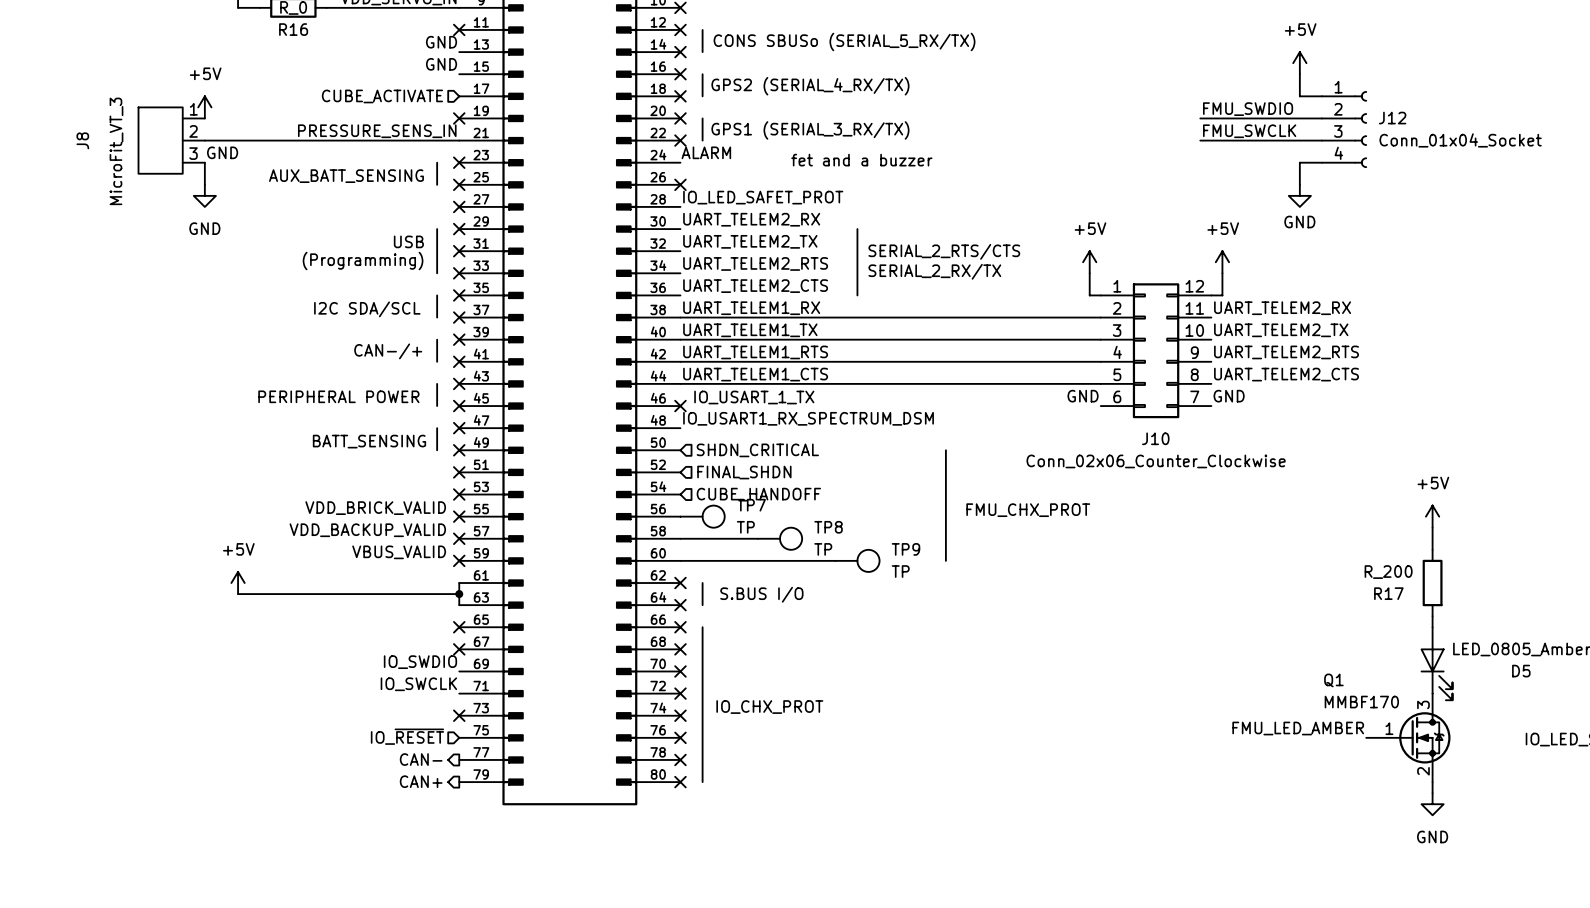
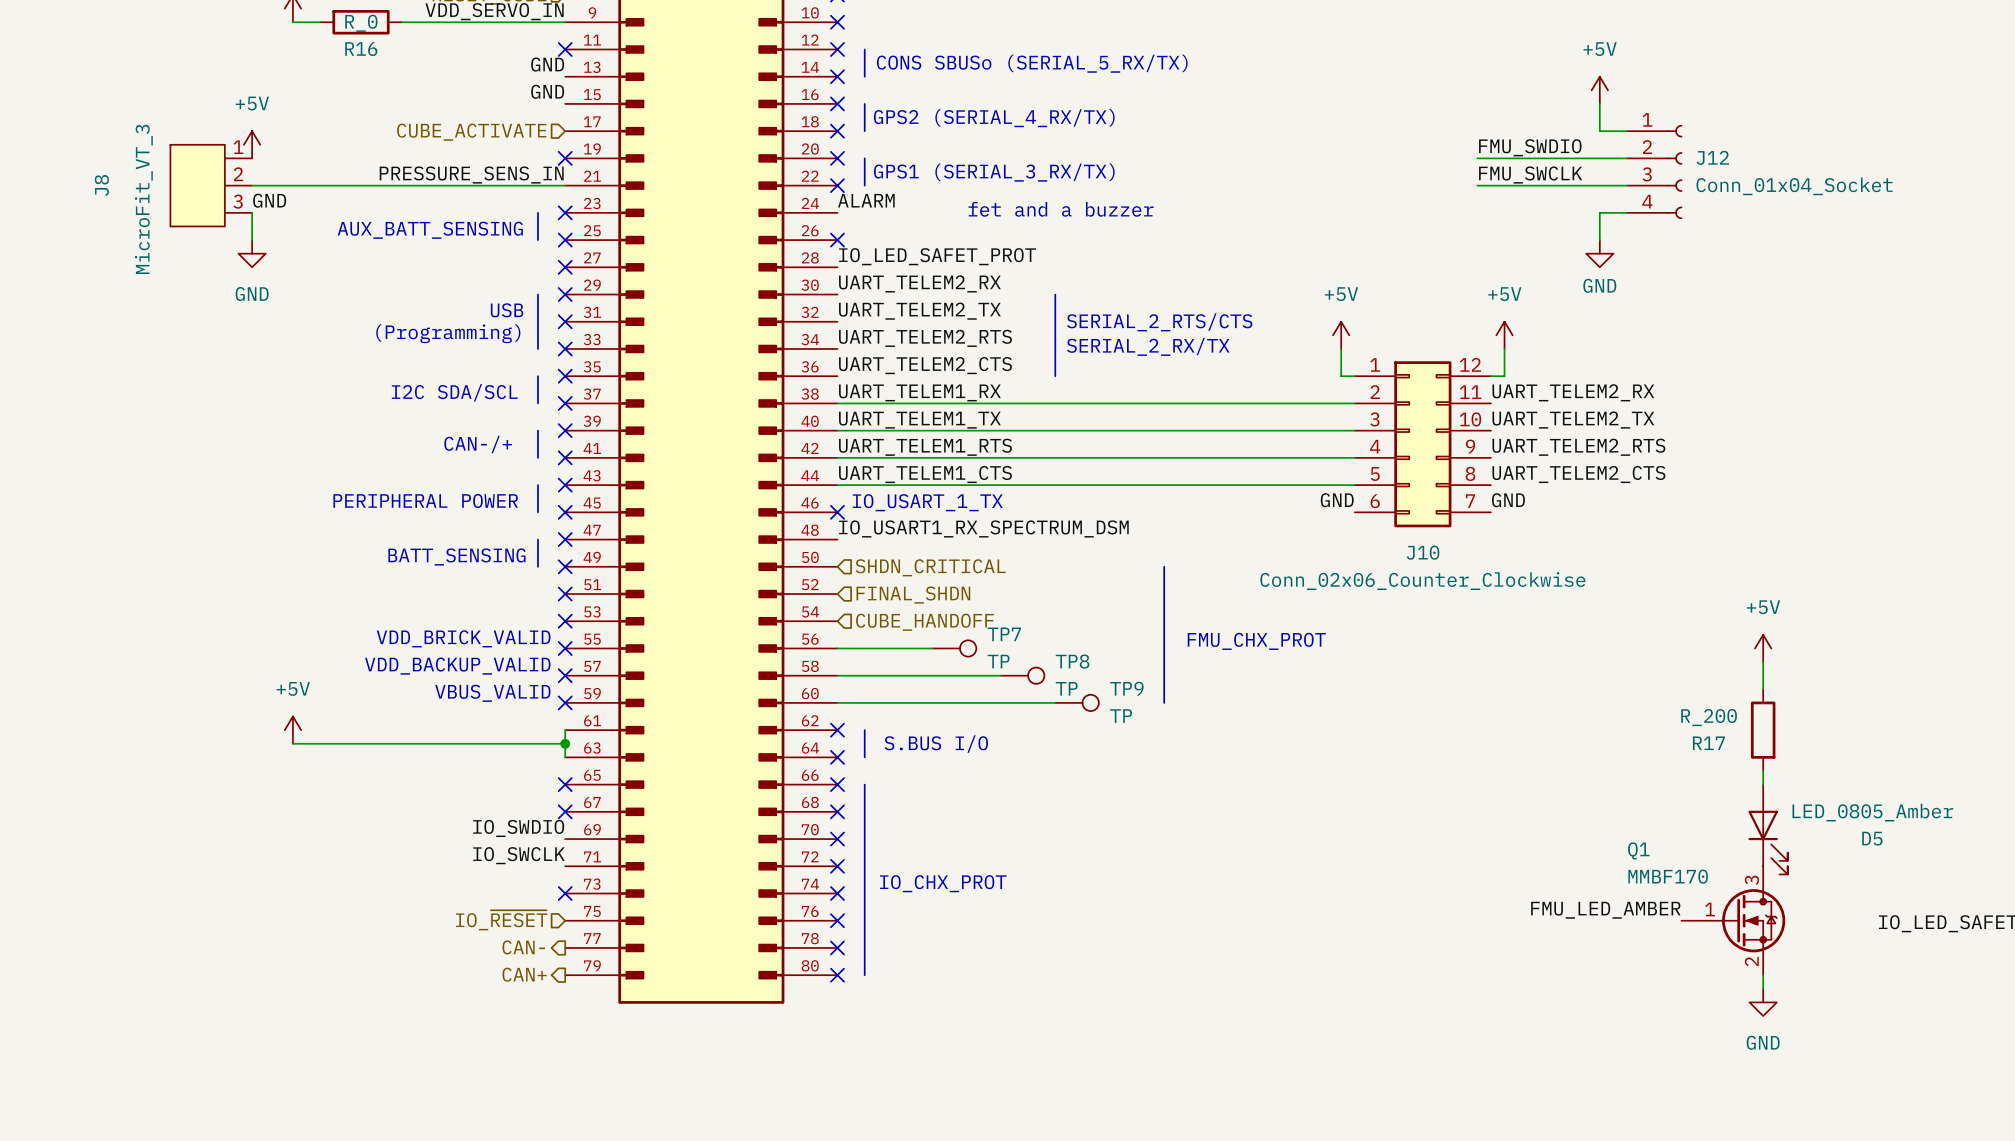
TP7 symbol: [680, 505, 725, 528] -> [932, 640, 977, 657]
wire: none -> (837, 648) (932, 648)
TP8 symbol: [757, 527, 803, 550] -> [1000, 667, 1045, 684]
wire: none -> (932, 675) (1000, 675)
TP9 symbol: [835, 549, 880, 572] -> [1055, 694, 1099, 712]

